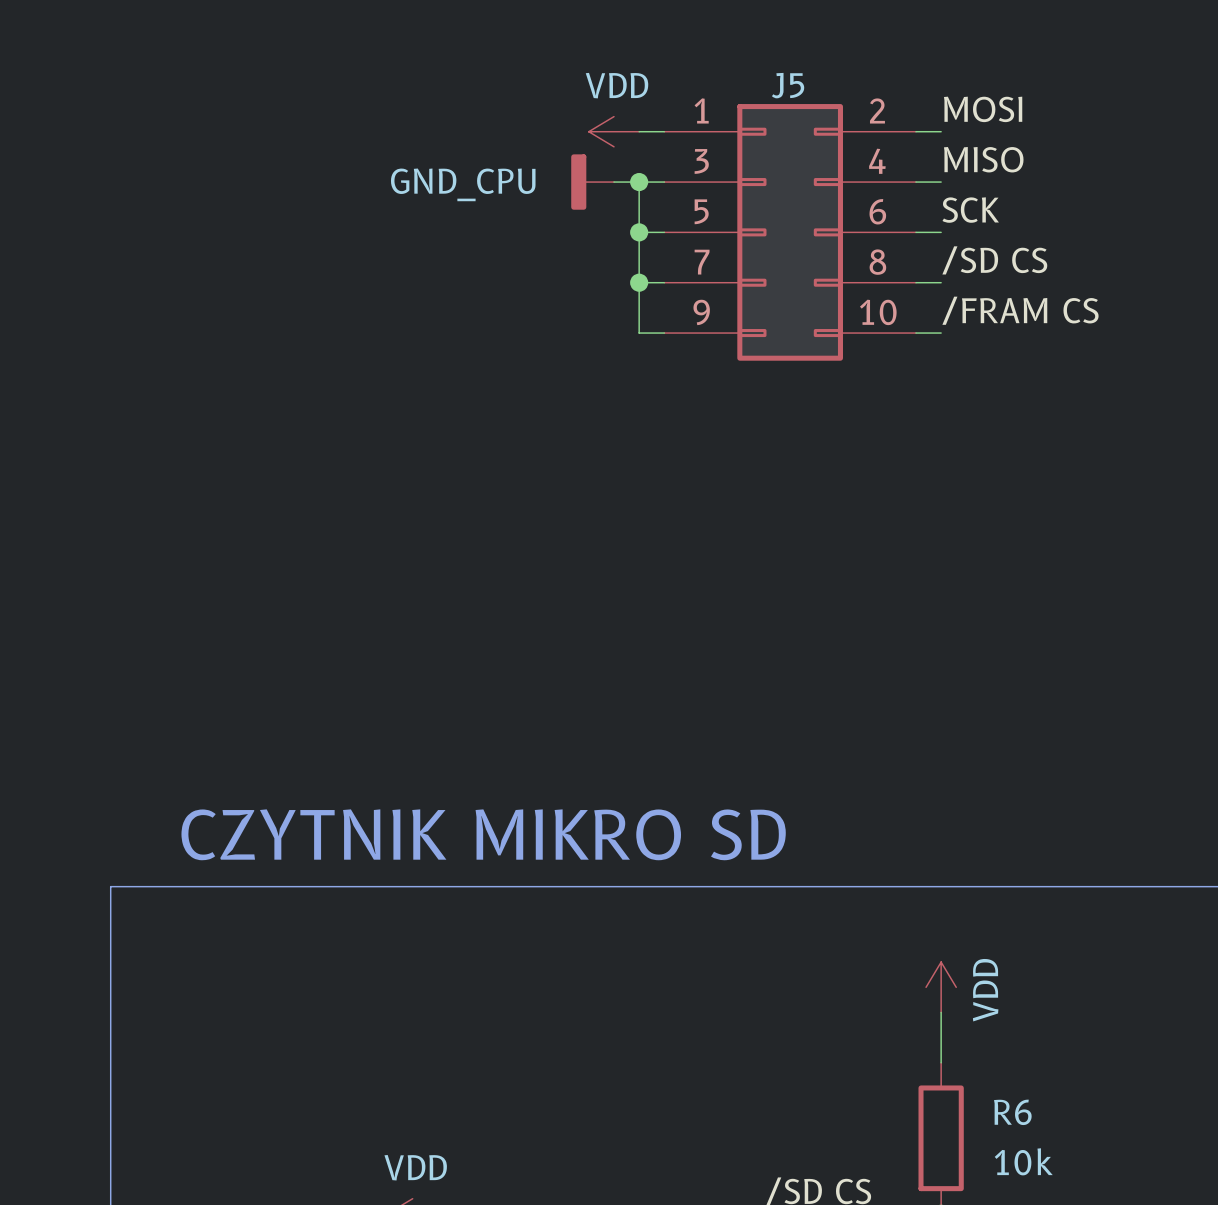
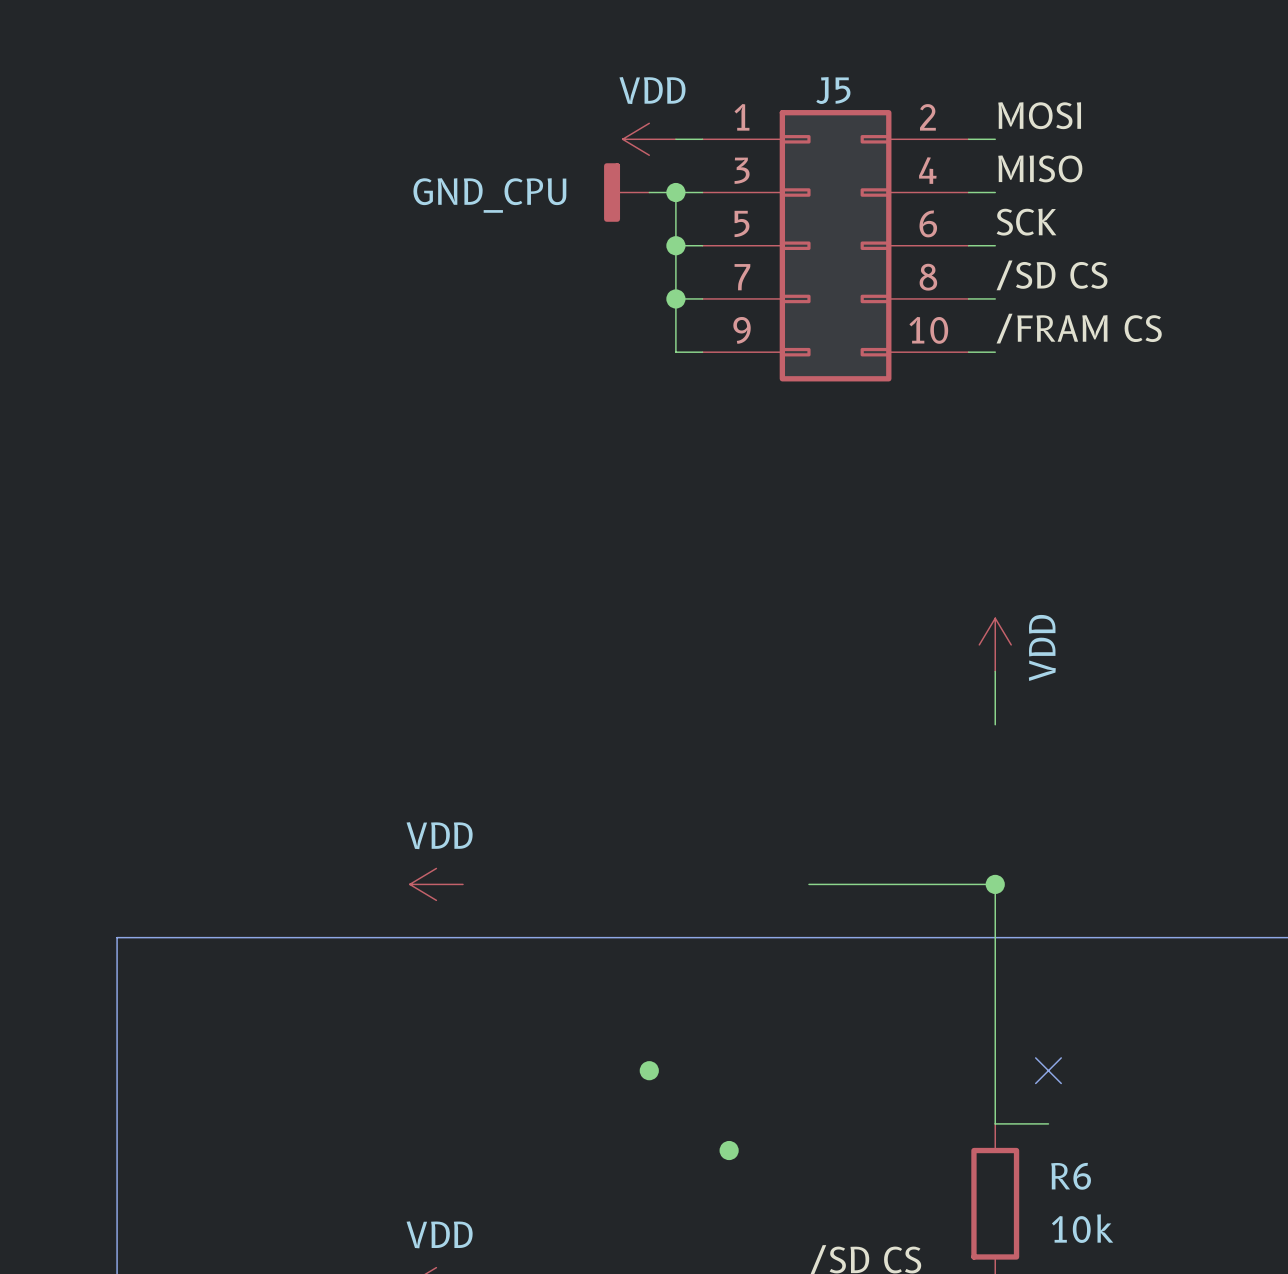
power symbol: none -> VDD (995, 644)
wire: none -> (995, 671) (995, 724)
text: CZYTNIK MIKRO SD (483, 834) -> none
power symbol: none -> VDD (436, 884)
wire: none -> (808, 884) (995, 884) (995, 1070)
junction: none -> (995, 884)
power symbol: VDD (941, 987) -> none
junction: none -> (649, 1070)
no-connect mark: none -> (1048, 1070)
wire: none -> (995, 1123) (1048, 1123)
junction: none -> (729, 1150)

